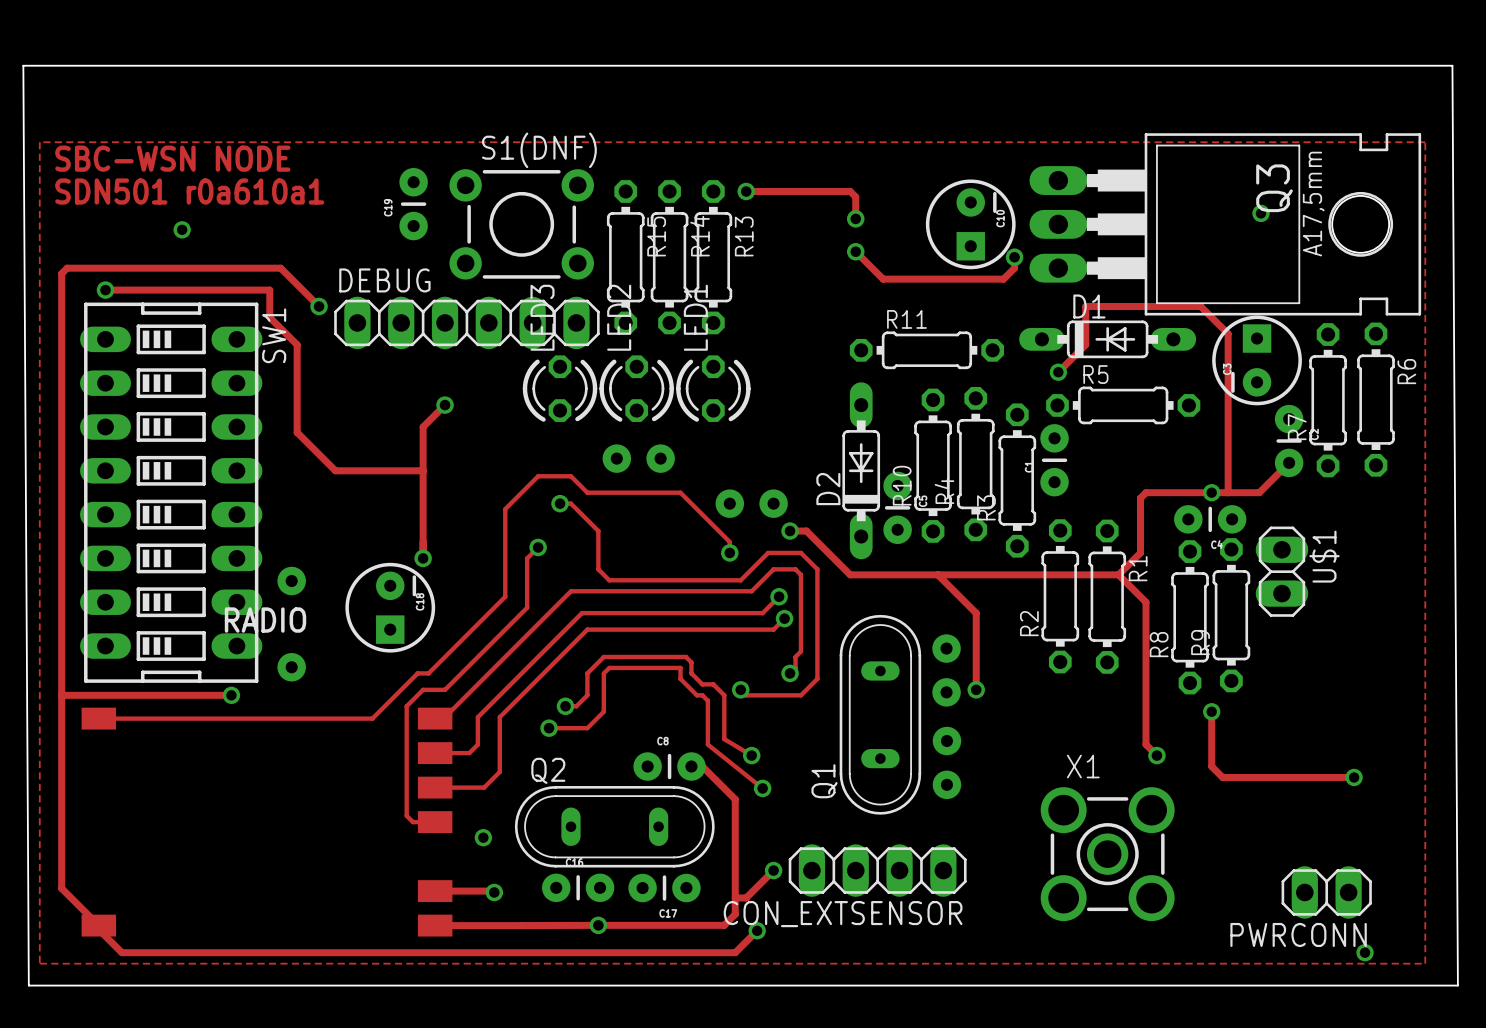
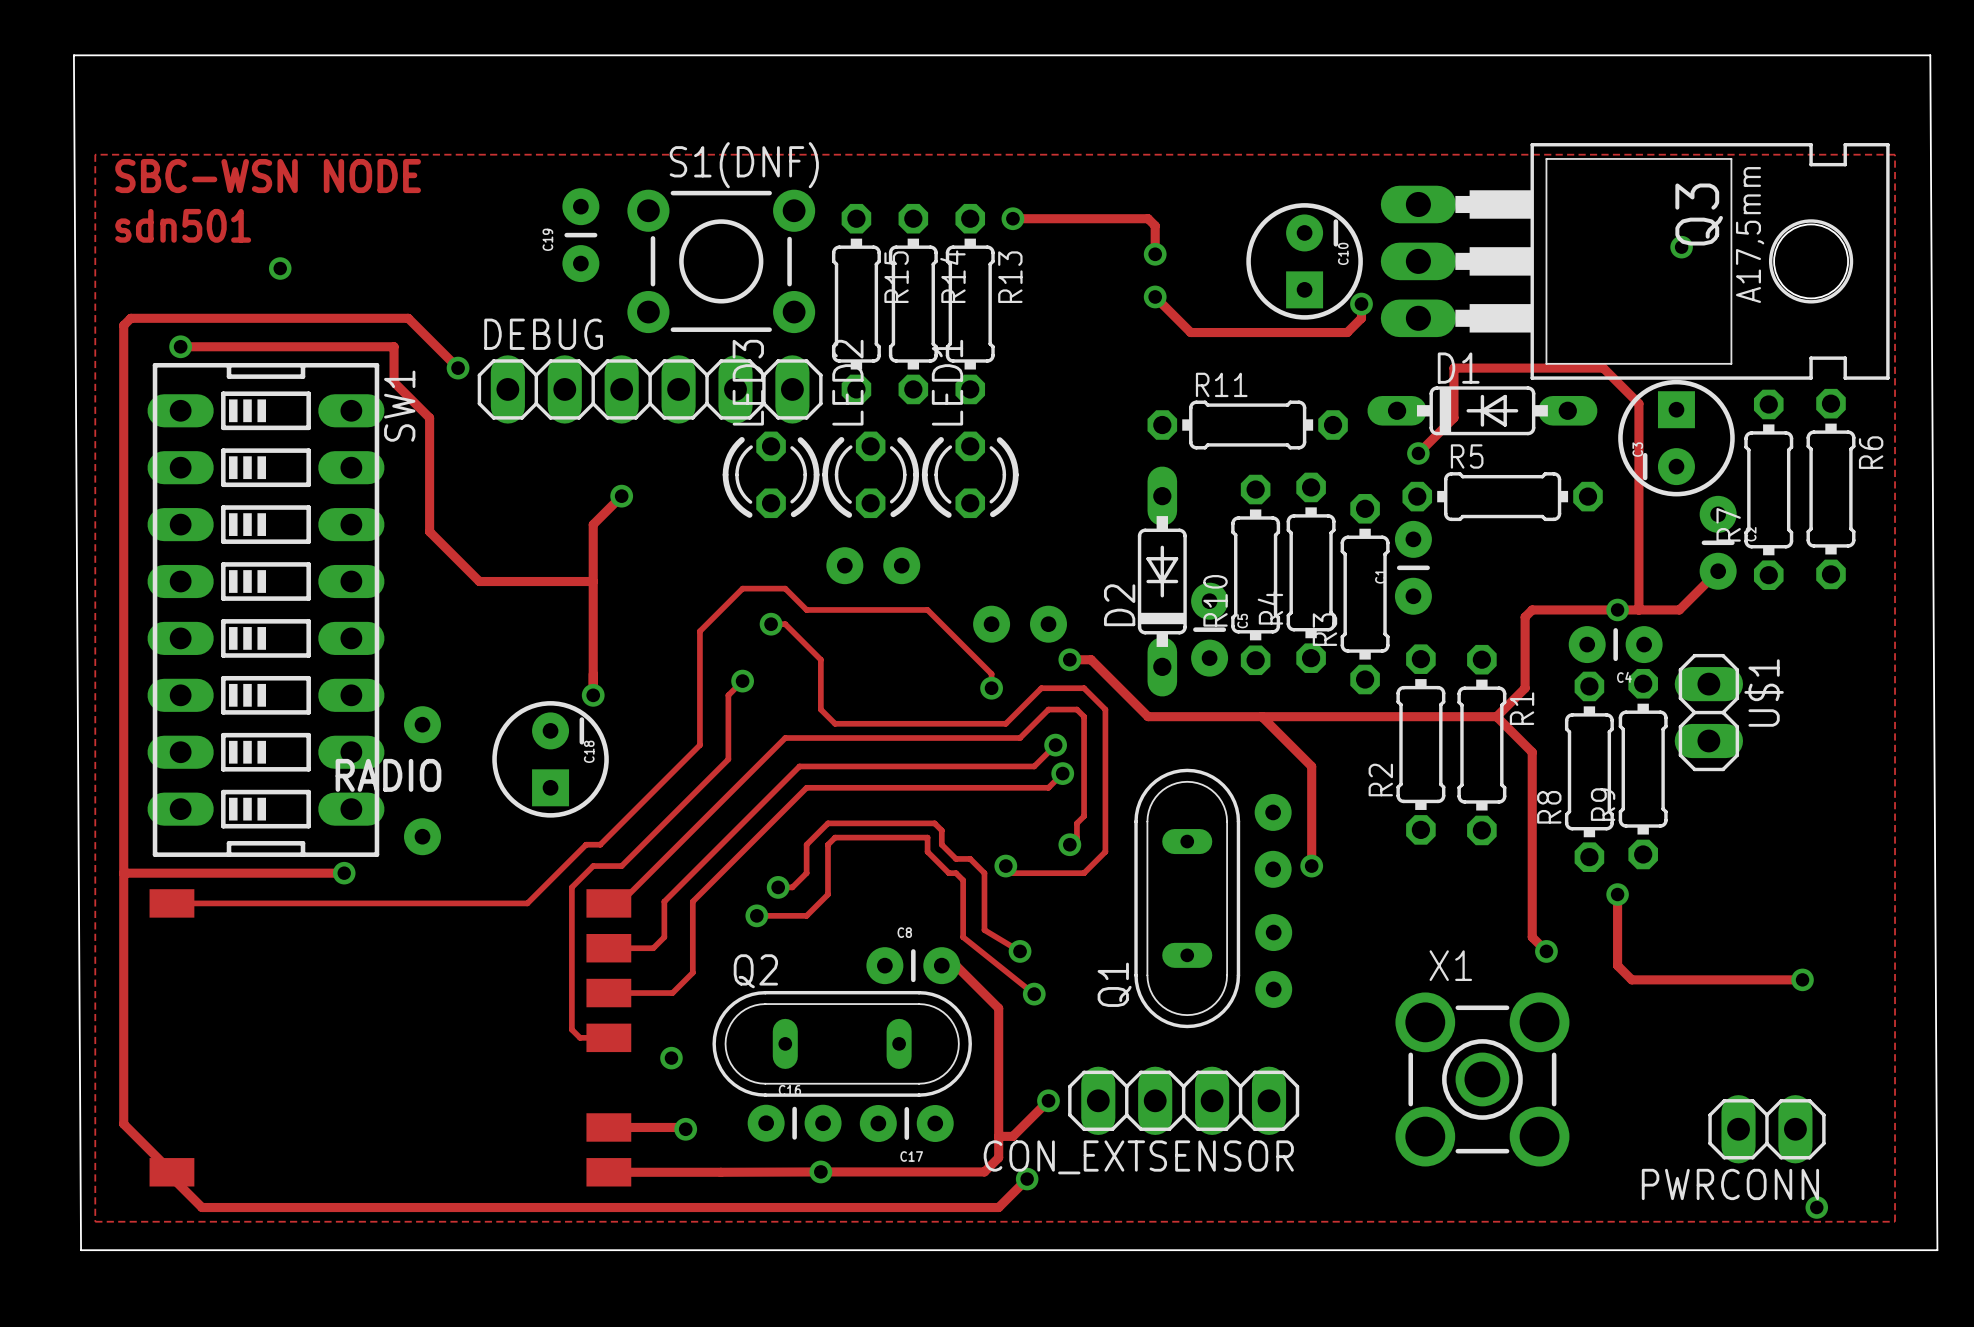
text: SDN501 r0a610a1 (189, 191) -> sdn501 (183, 225)

